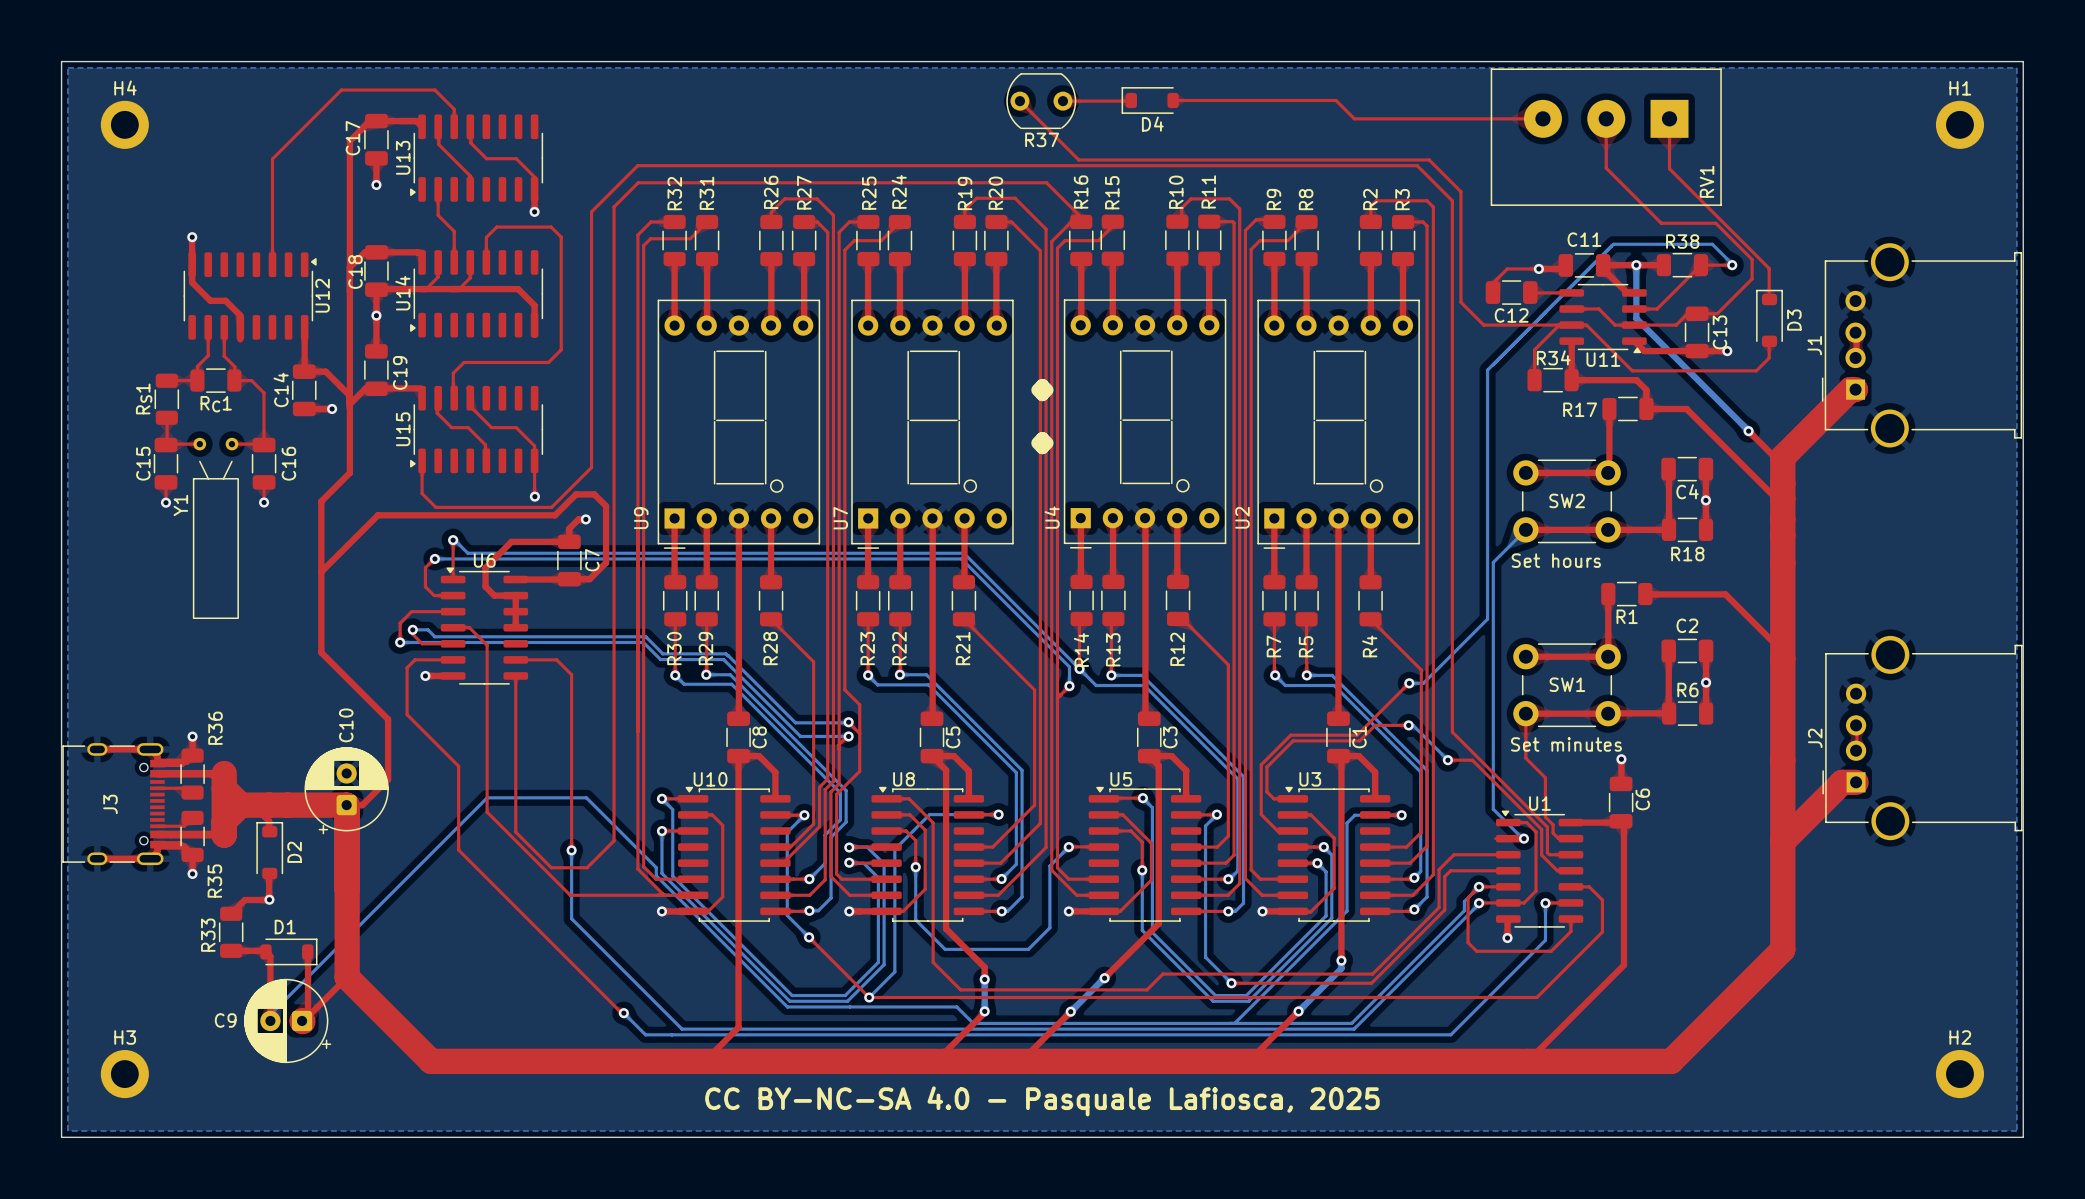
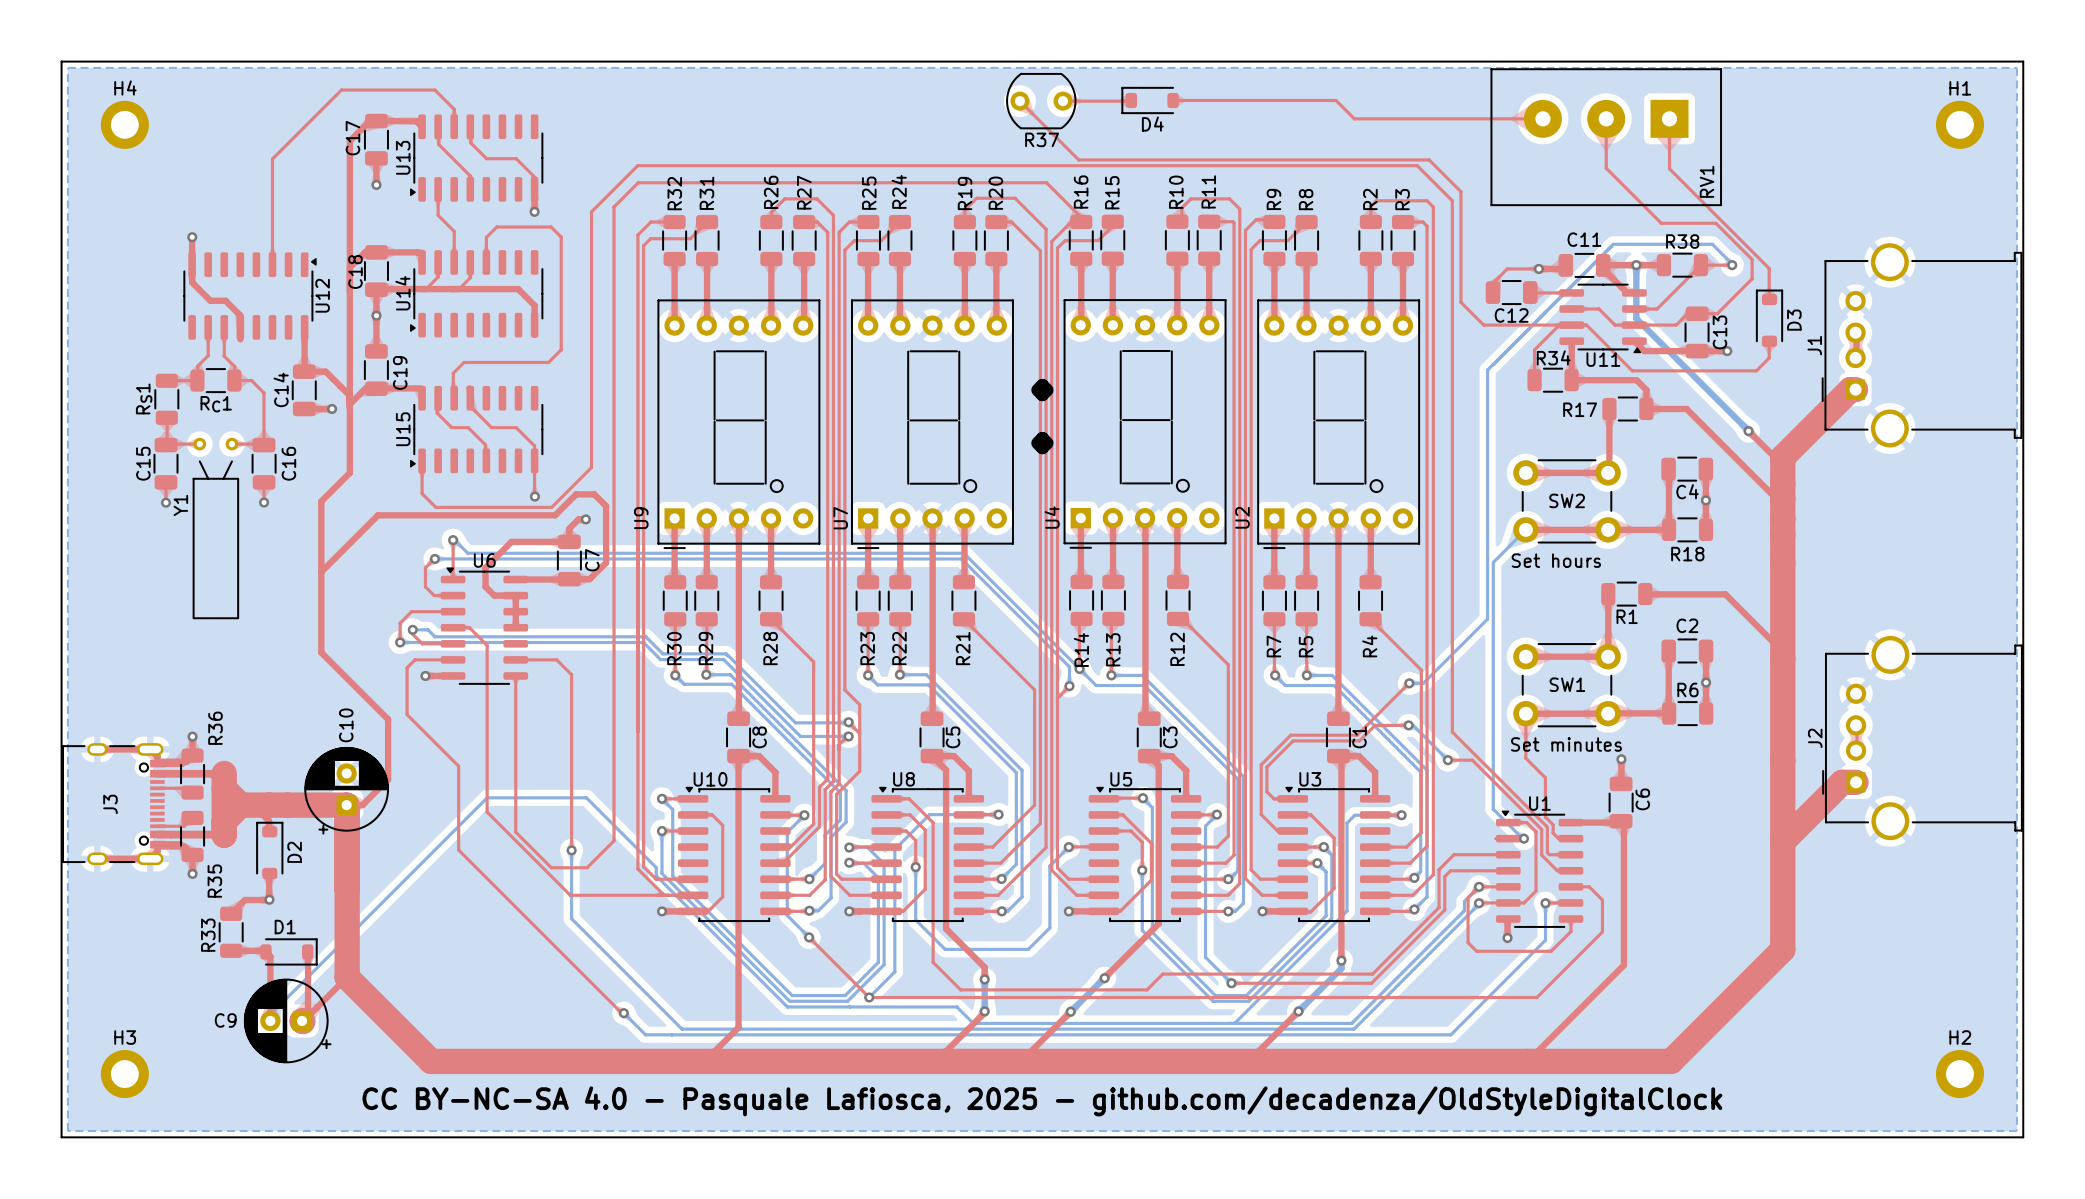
text: CC BY-NC-SA 4.0 - Pasquale Lafiosca, 2025 (1042, 1101) -> CC BY-NC-SA 4.0 - Pasquale Lafiosca, 2025 - github.com/decadenza/OldStyleDigitalClock (1042, 1101)

